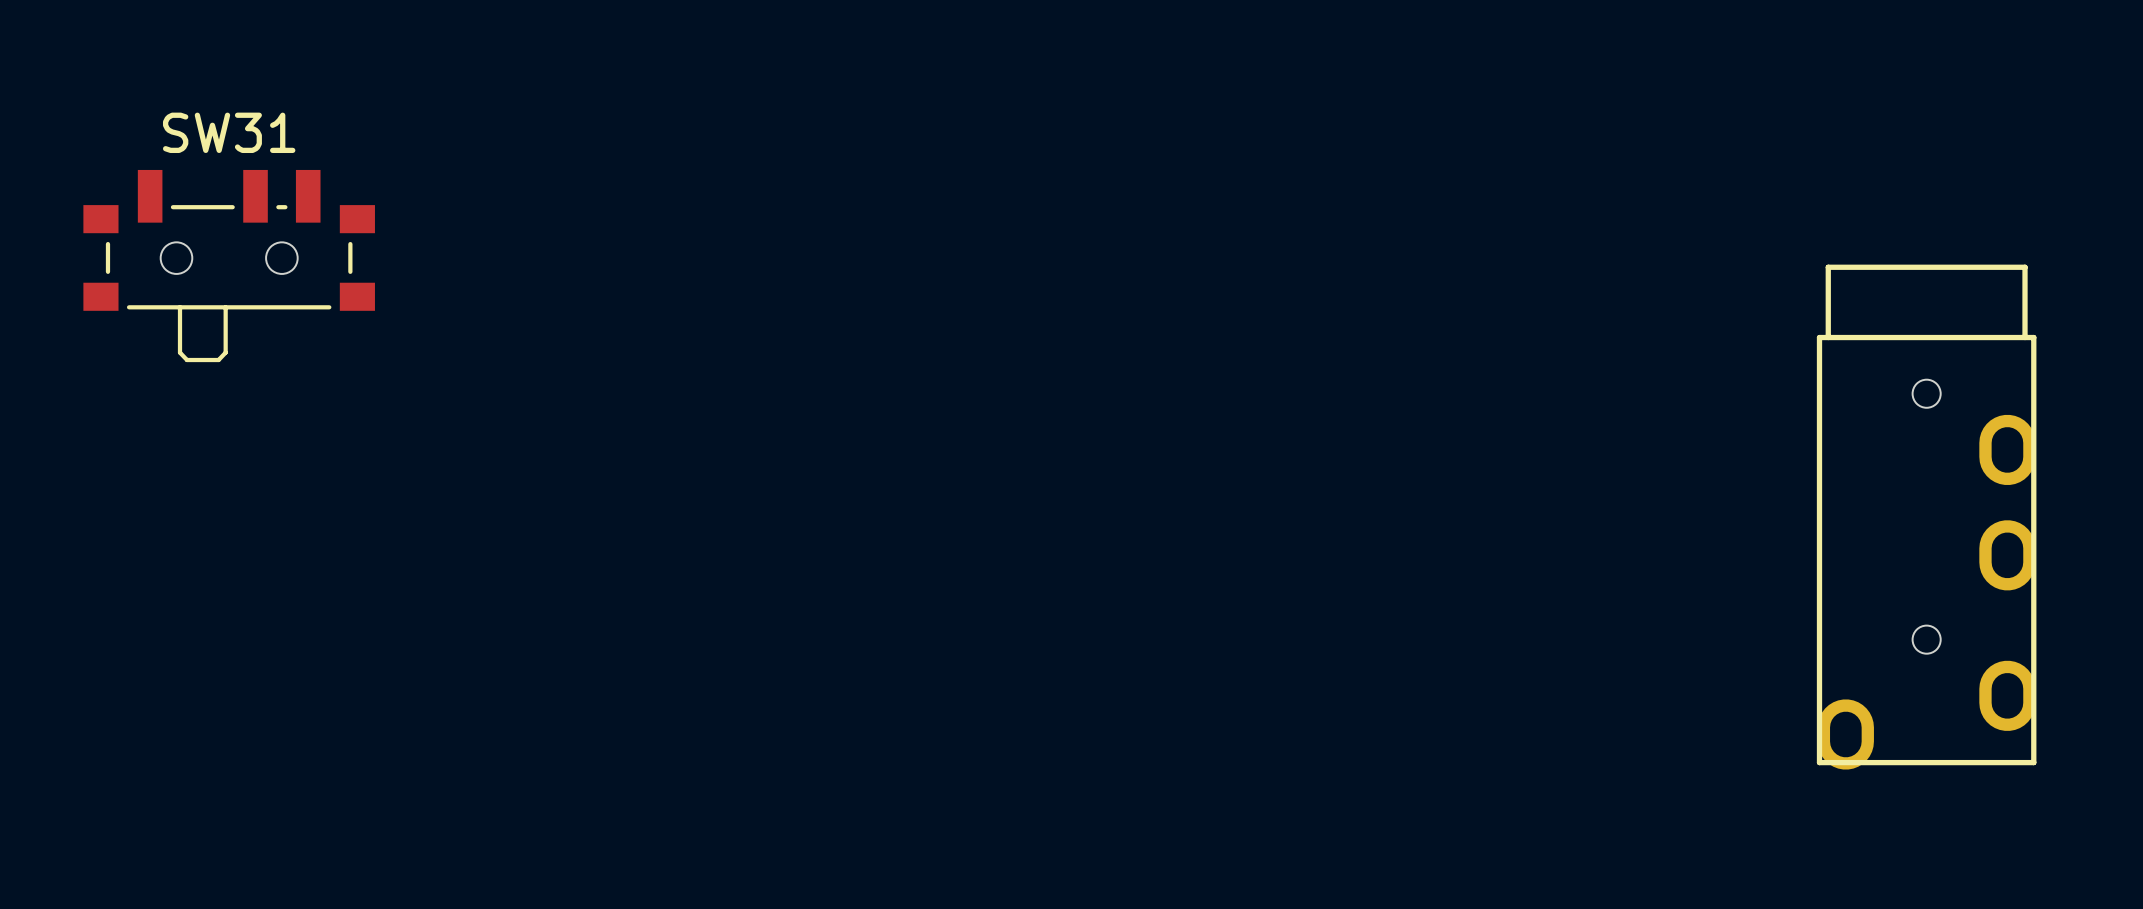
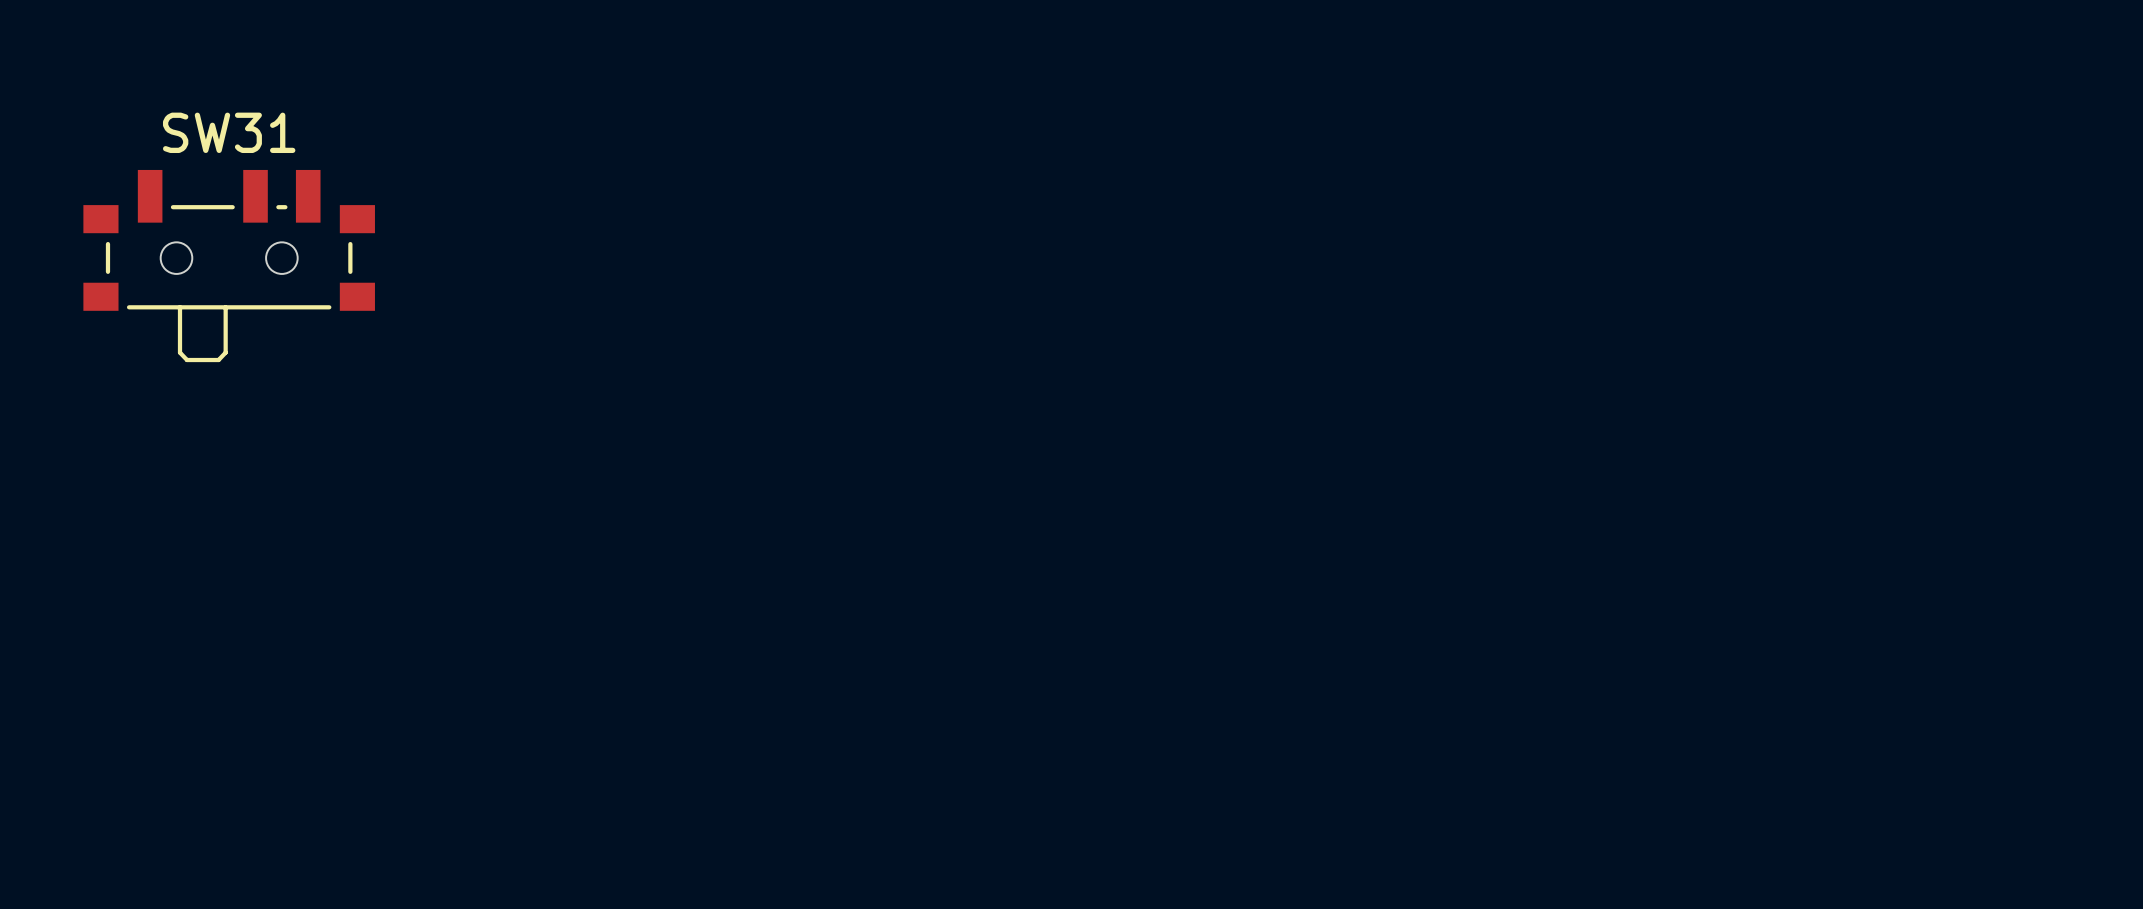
part: (1926, 517) -> none

